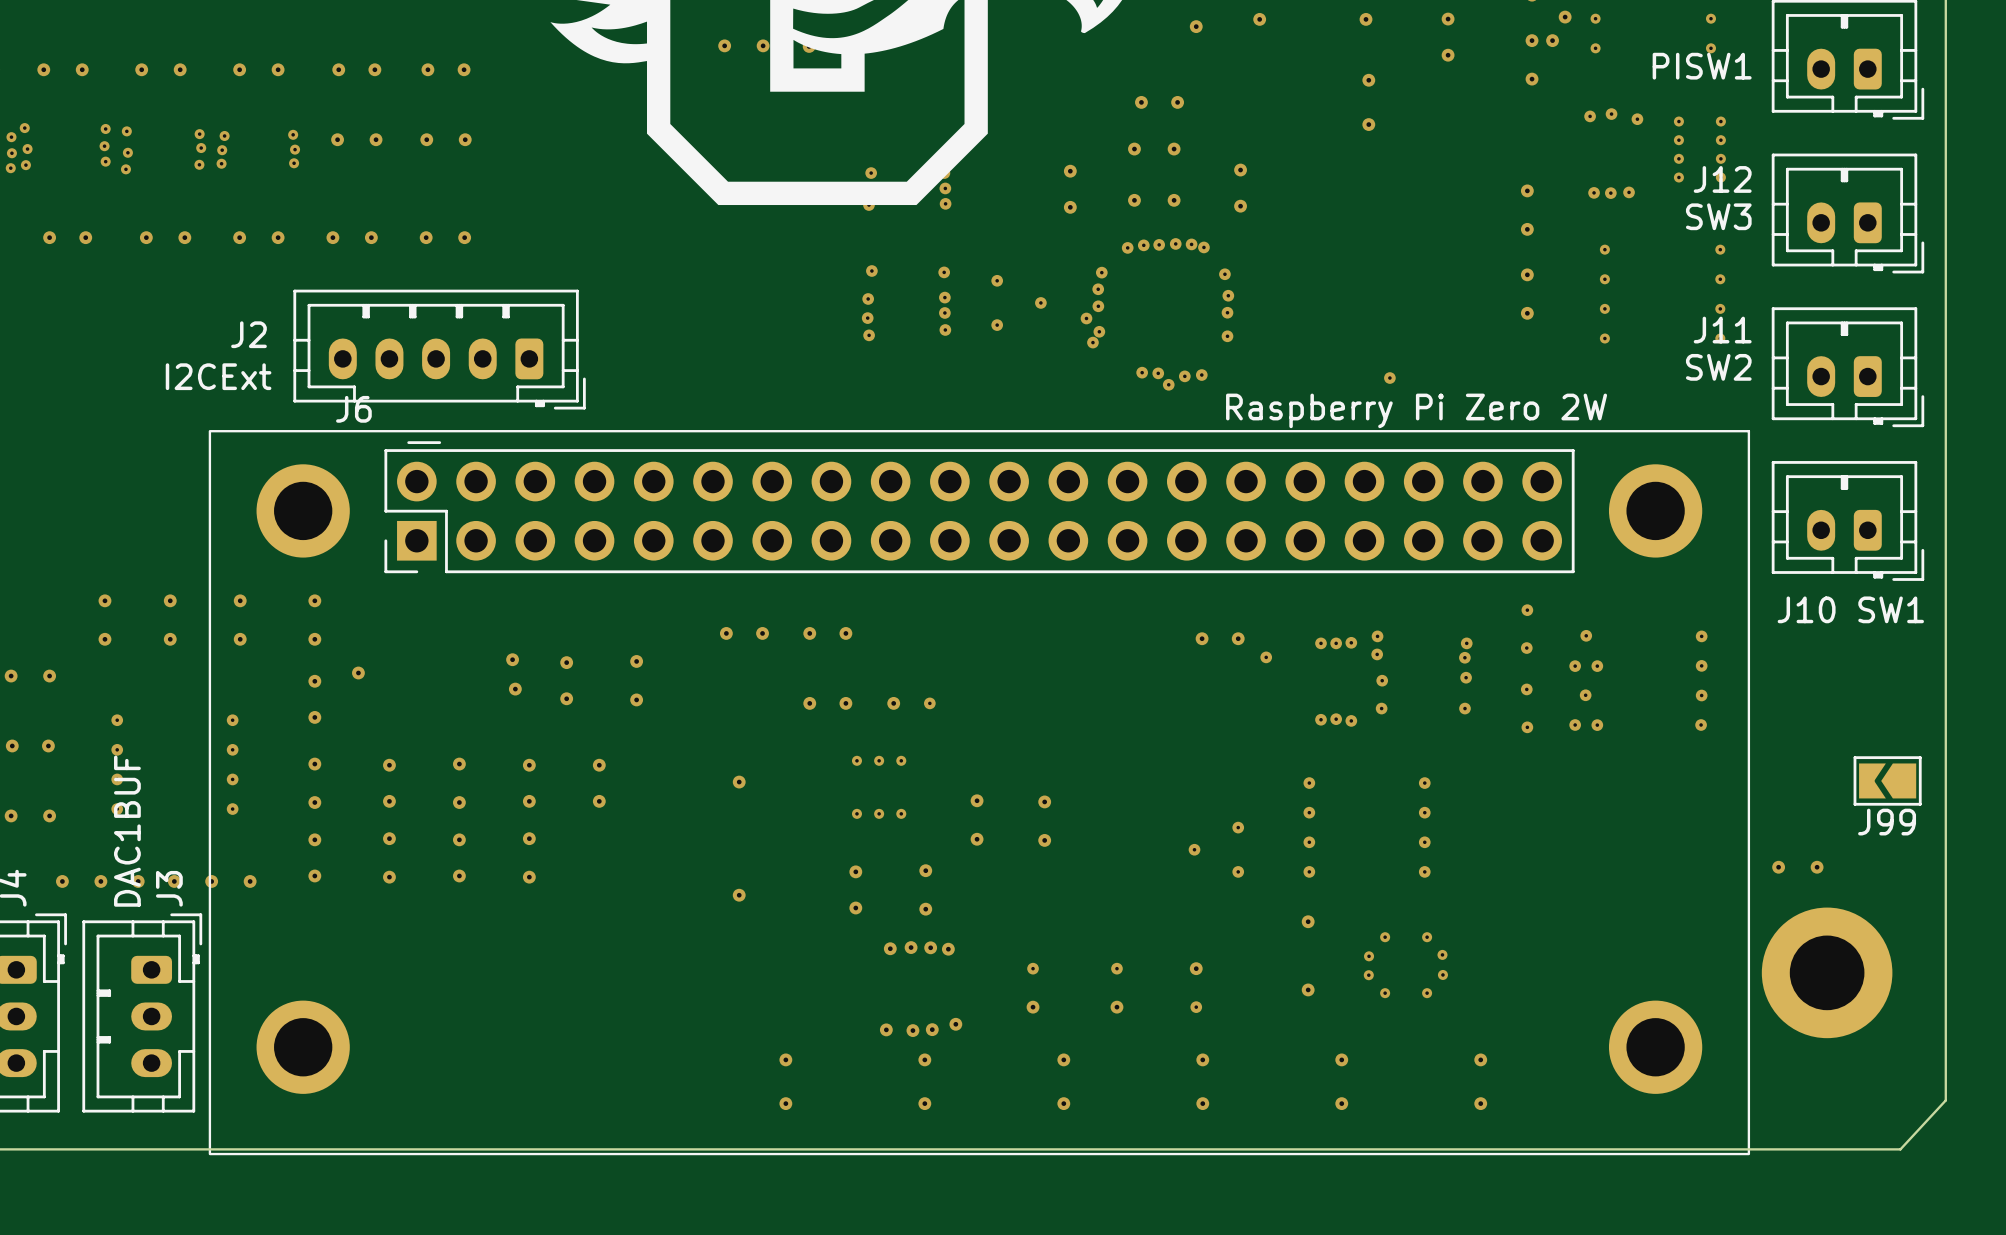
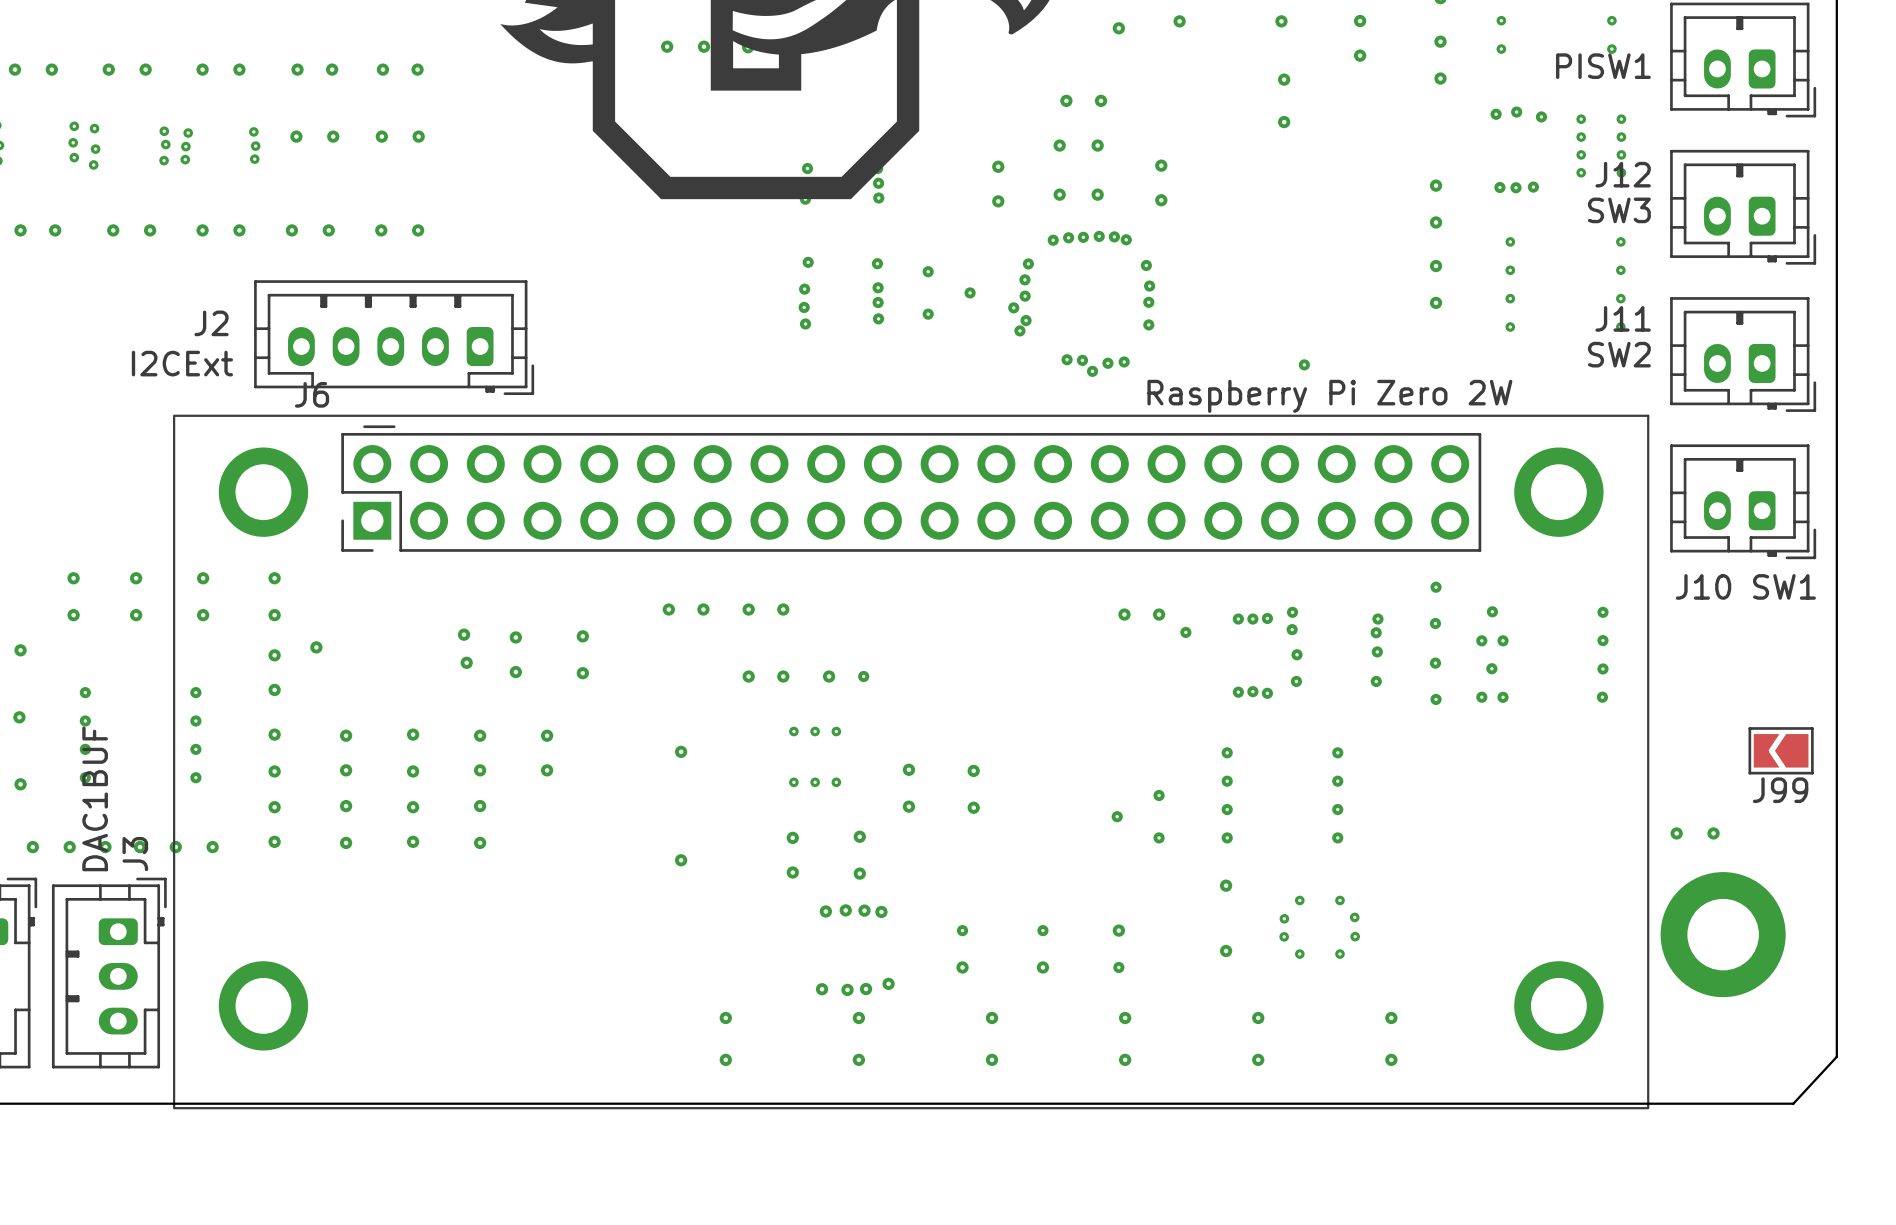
via: (1565, 17) -> none
via: (1552, 40) -> none

